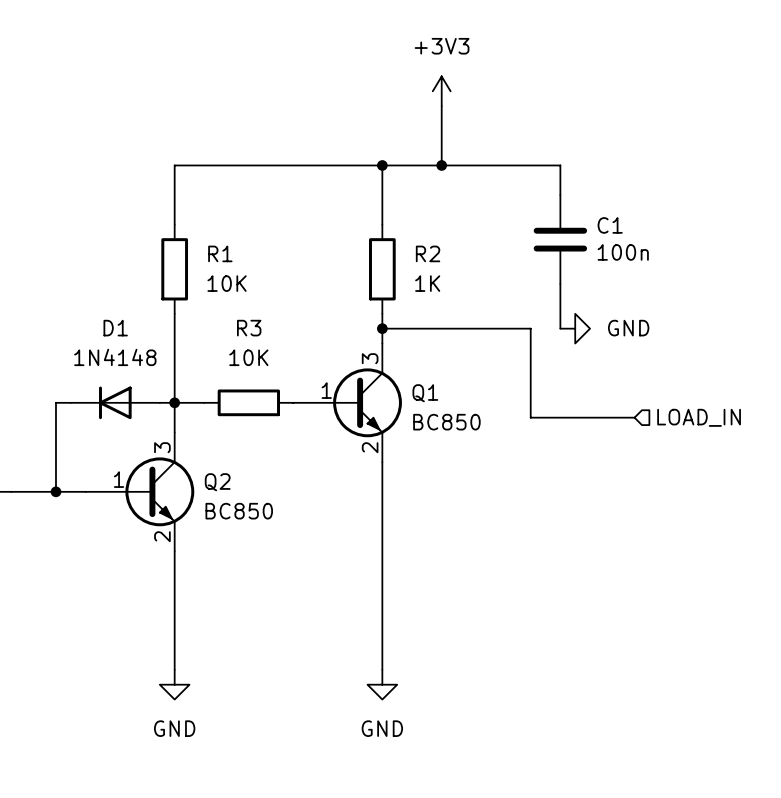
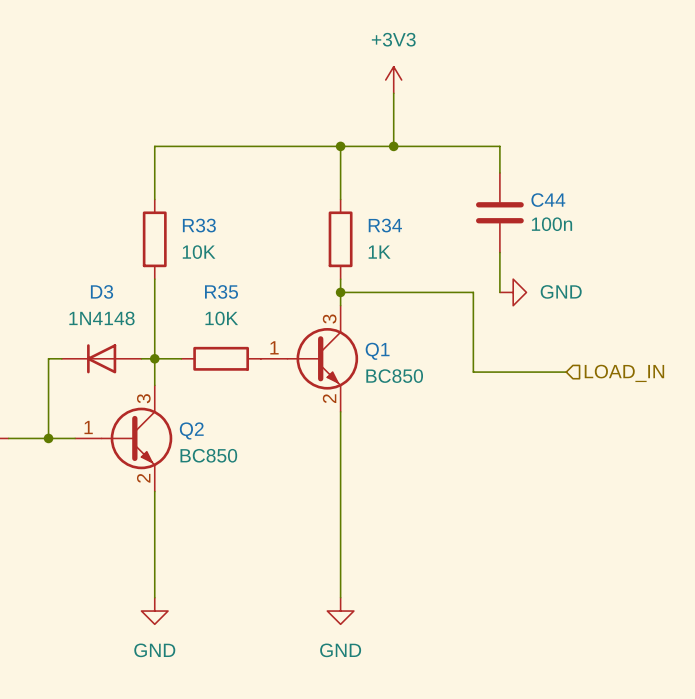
C1 name: C1 (610, 225) -> C44 (548, 200)
R1 name: R1 (220, 253) -> R33 (199, 225)
R2 name: R2 (428, 253) -> R34 (385, 225)
D1 name: D1 (115, 328) -> D3 (102, 291)
R3 name: R3 (249, 328) -> R35 (221, 291)
Q1 symbol: [293, 343, 402, 463] -> [260, 305, 359, 412]
Q2 symbol: [85, 432, 195, 552] -> [75, 385, 173, 492]

